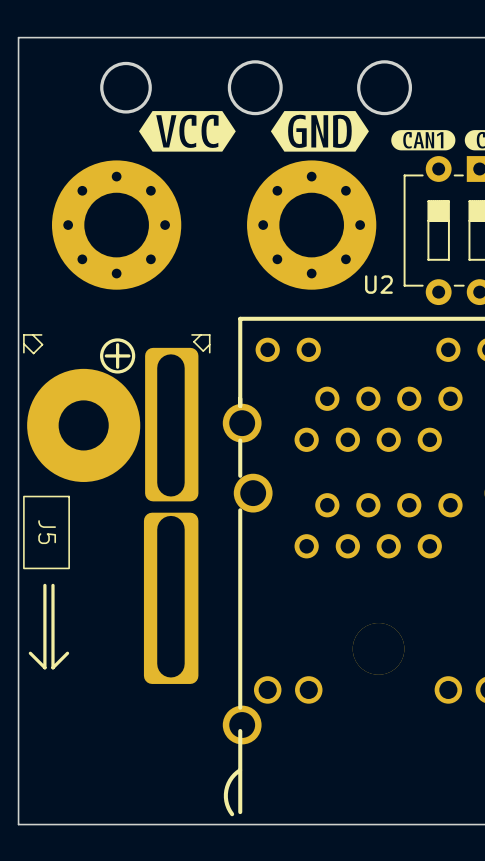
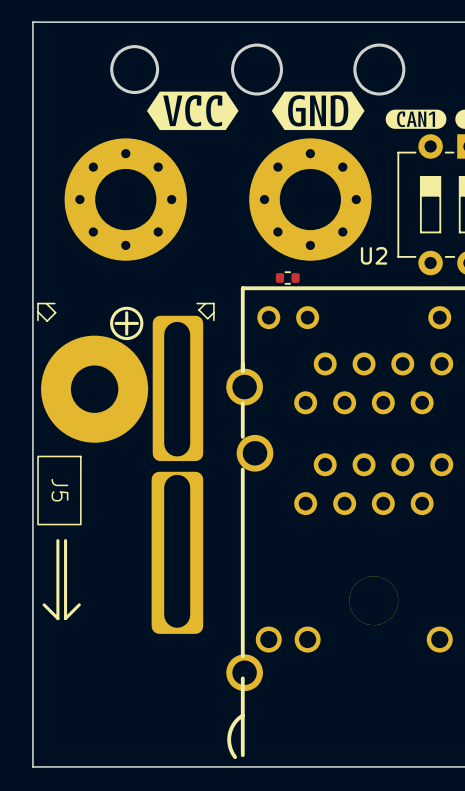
part: none -> (287, 278)

